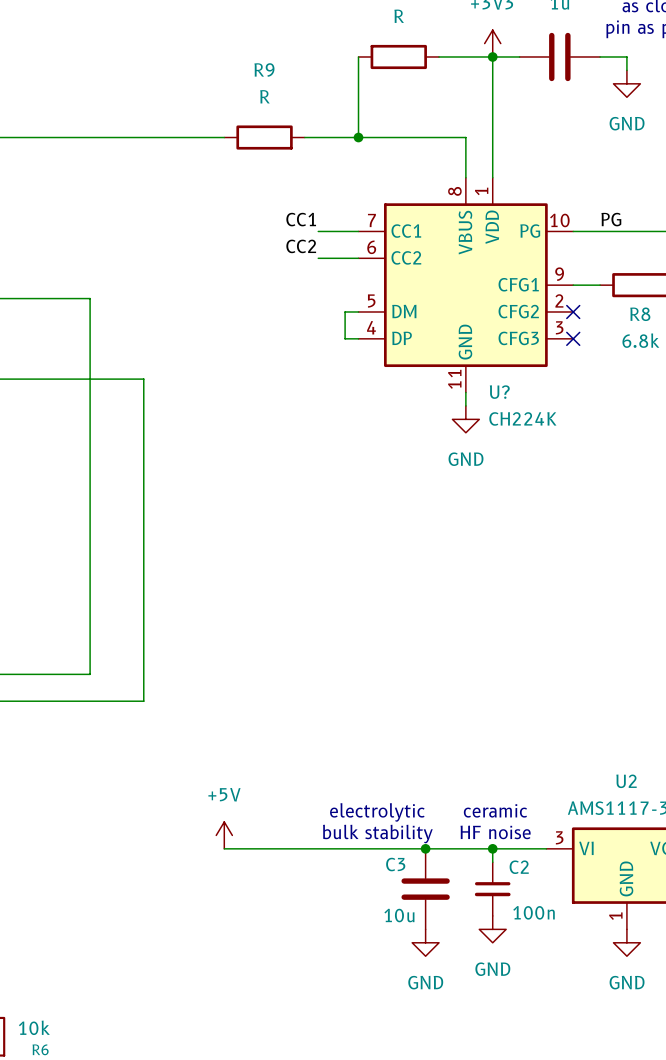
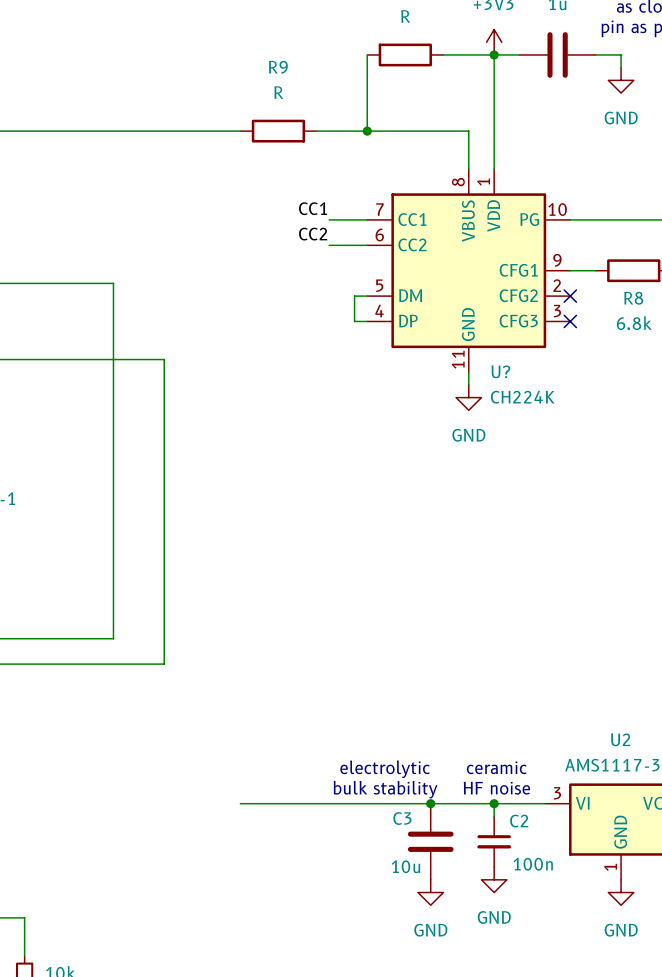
label: PG (611, 219) -> none
power symbol: +5V (224, 835) -> none

